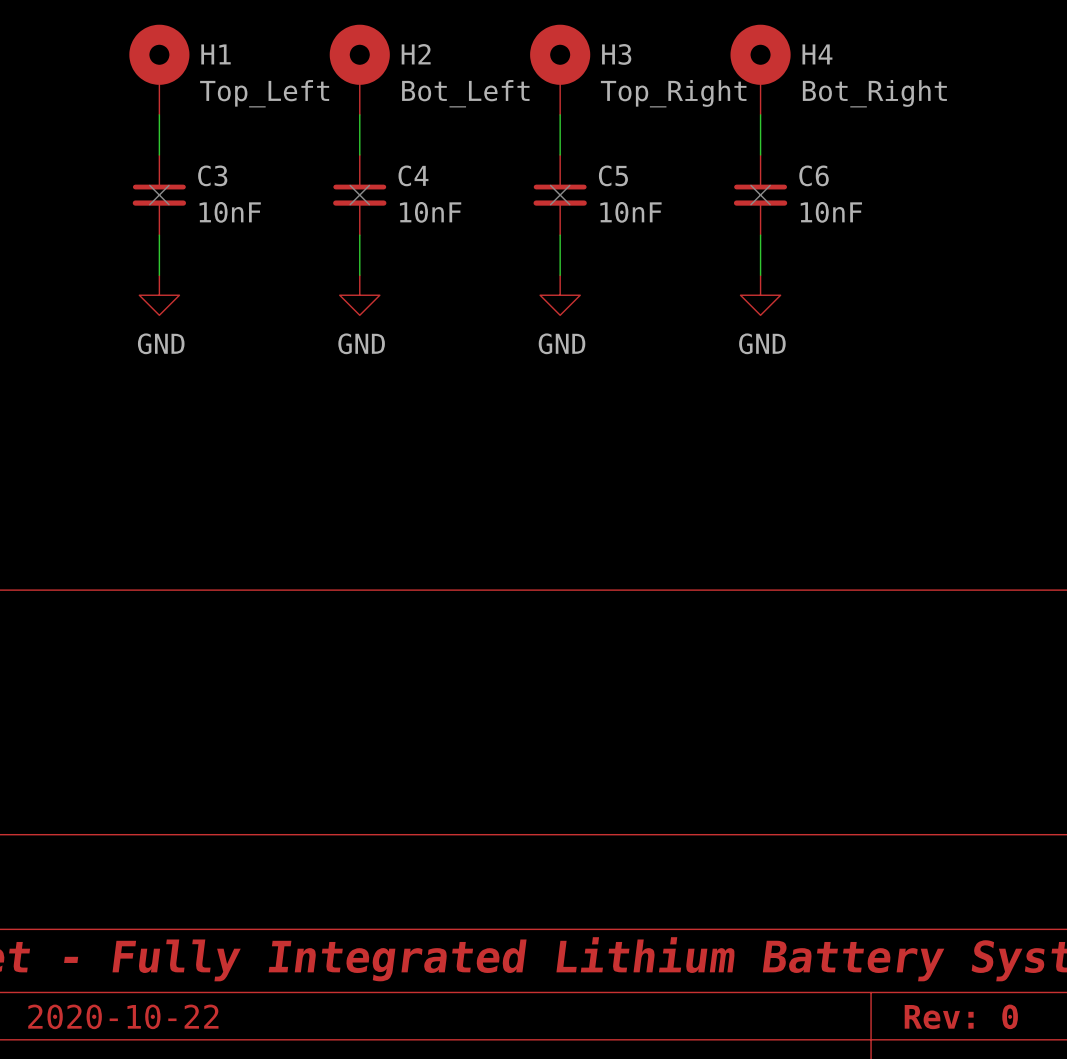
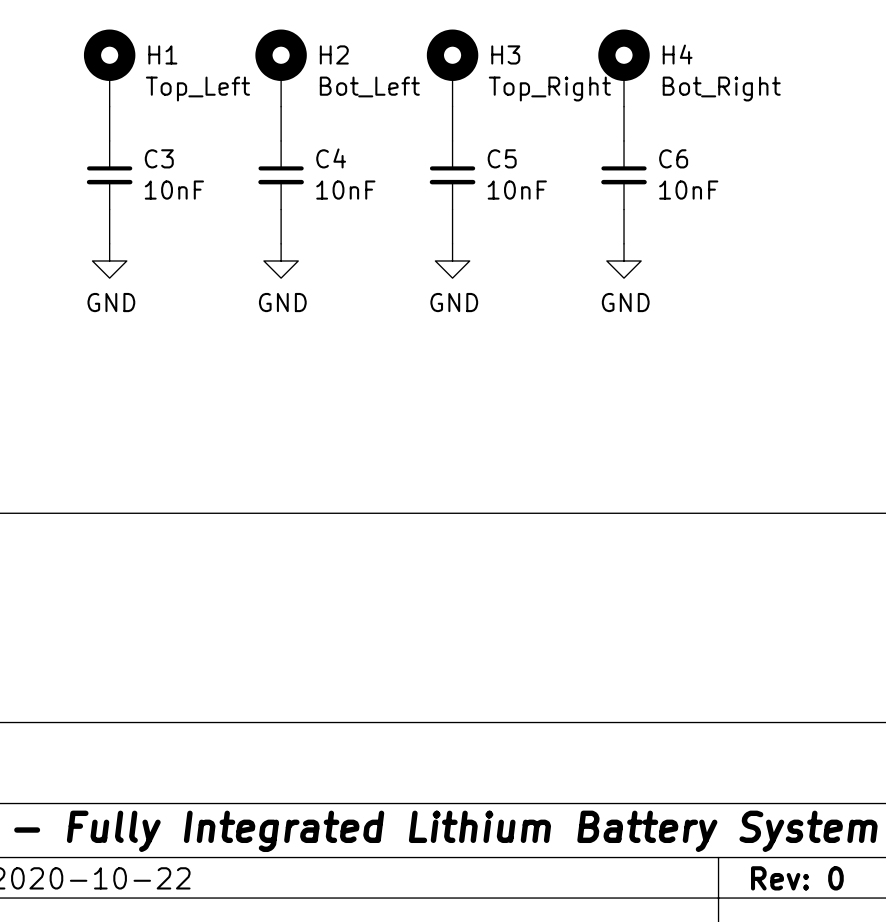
no-connect mark: (159, 195) -> none
no-connect mark: (359, 195) -> none
no-connect mark: (560, 195) -> none
no-connect mark: (760, 195) -> none

